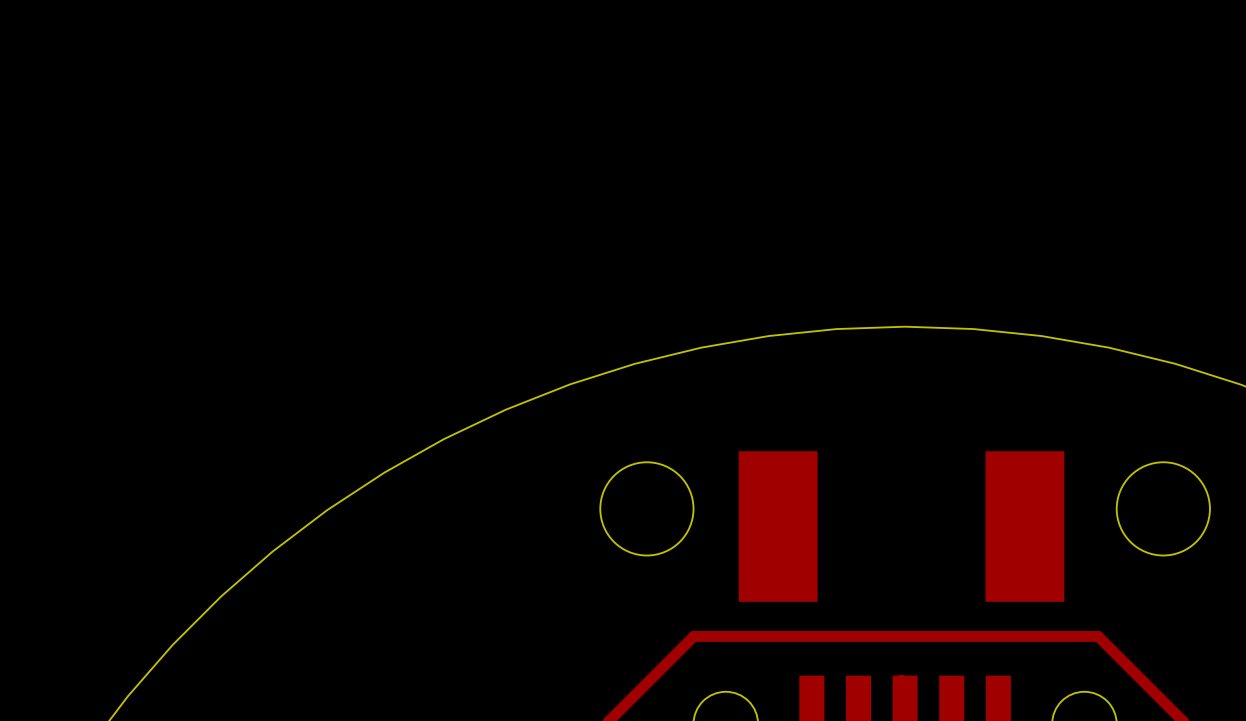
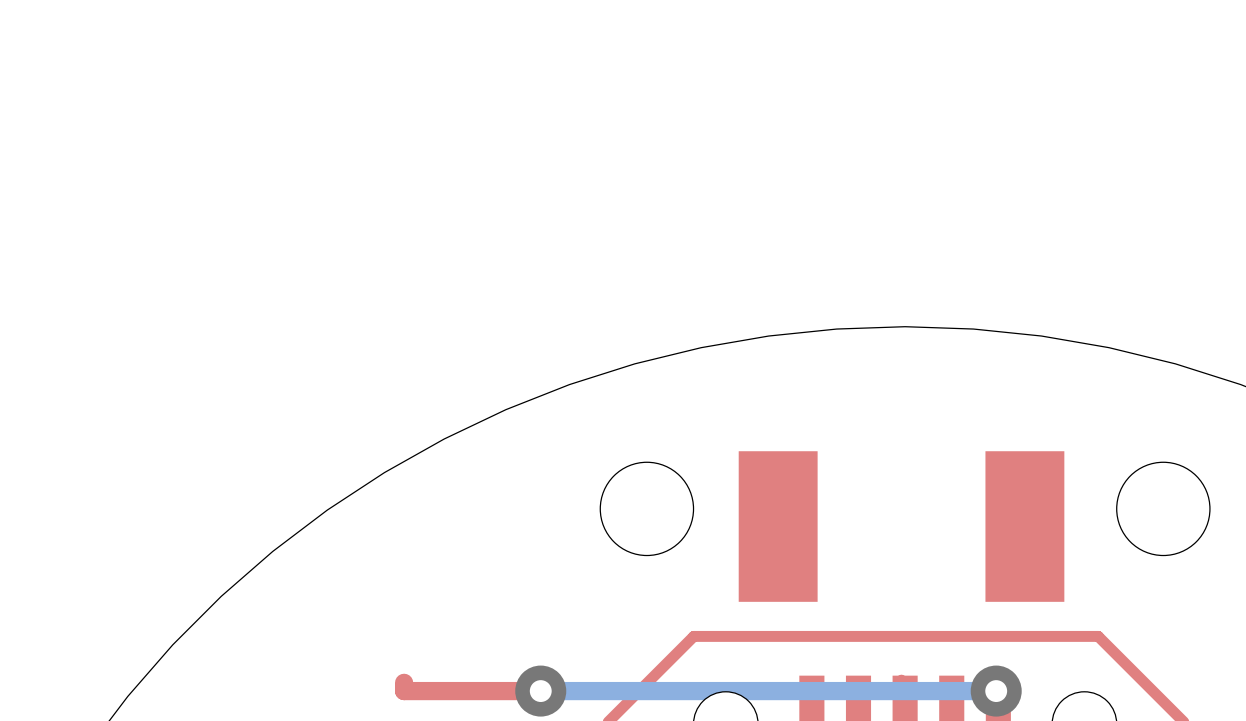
top track: none -> (404, 682) (404, 691) (540, 691)
via: none -> (540, 691)
bottom track: none -> (996, 691) (540, 691)
via: none -> (996, 691)

